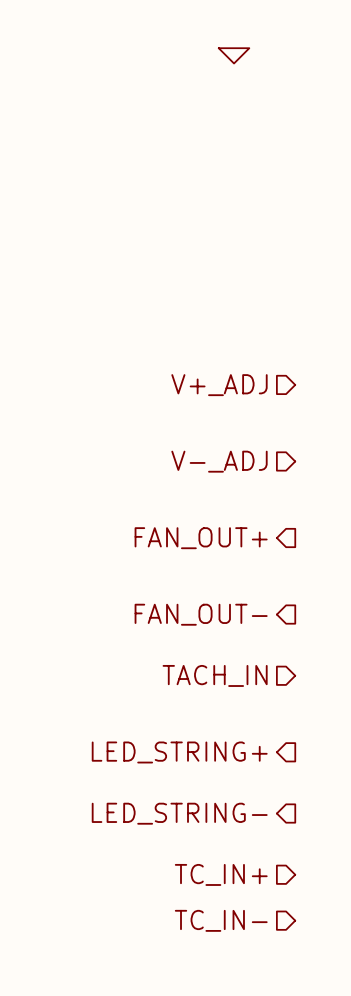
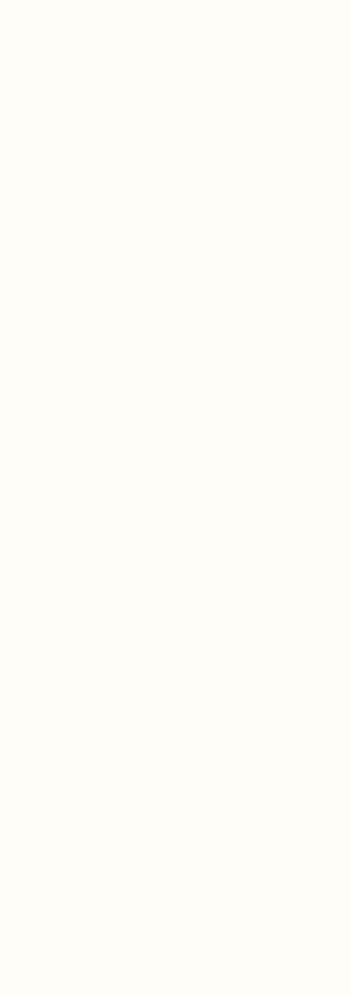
power symbol: (234, 55) -> none
hierarchical label: V+_ADJ (219, 385) -> none
hierarchical label: V-_ADJ (219, 461) -> none
hierarchical label: FAN_OUT+ (201, 538) -> none
hierarchical label: FAN_OUT- (201, 614) -> none
hierarchical label: TACH_IN (215, 675) -> none
hierarchical label: LED_STRING+ (179, 752) -> none
hierarchical label: LED_STRING- (179, 813) -> none
hierarchical label: TC_IN+ (221, 874) -> none
hierarchical label: TC_IN- (221, 920) -> none

